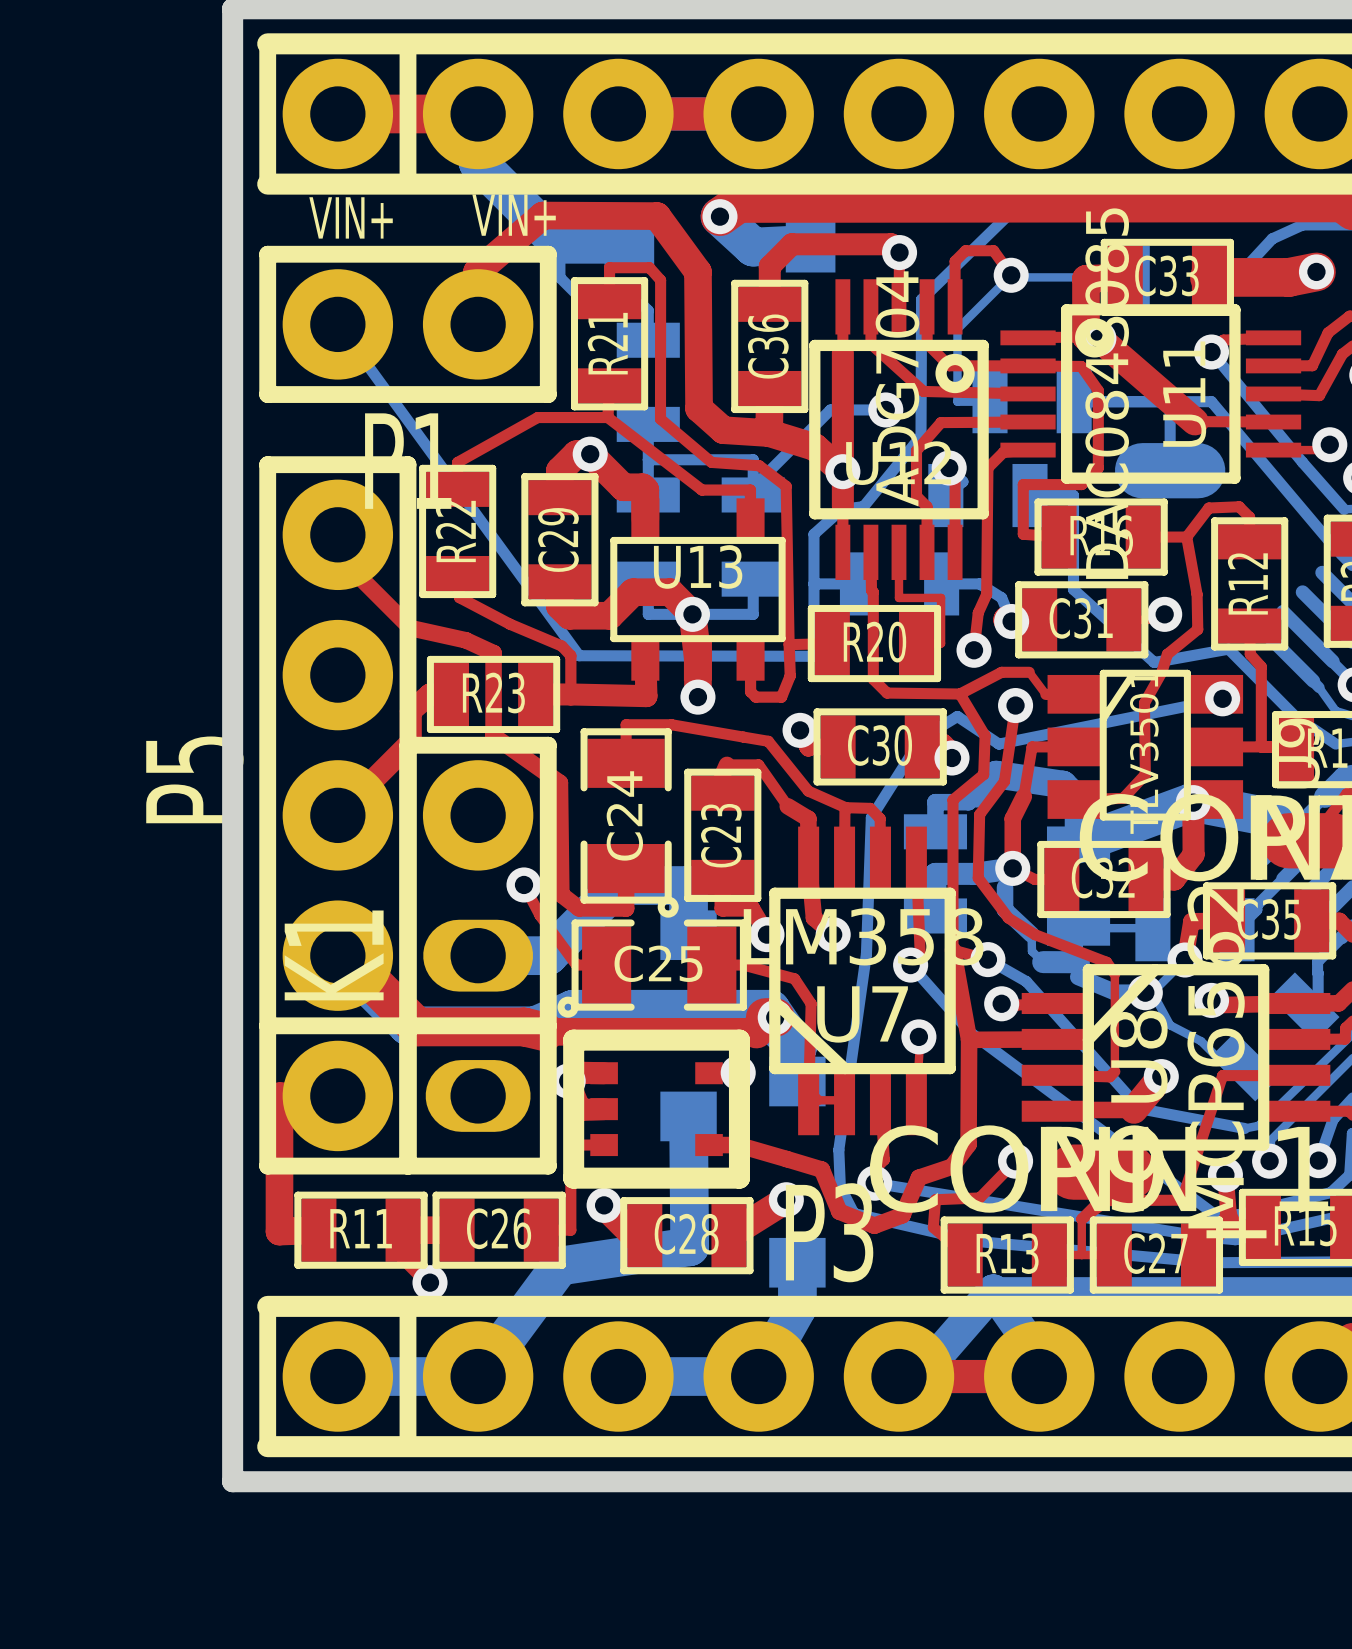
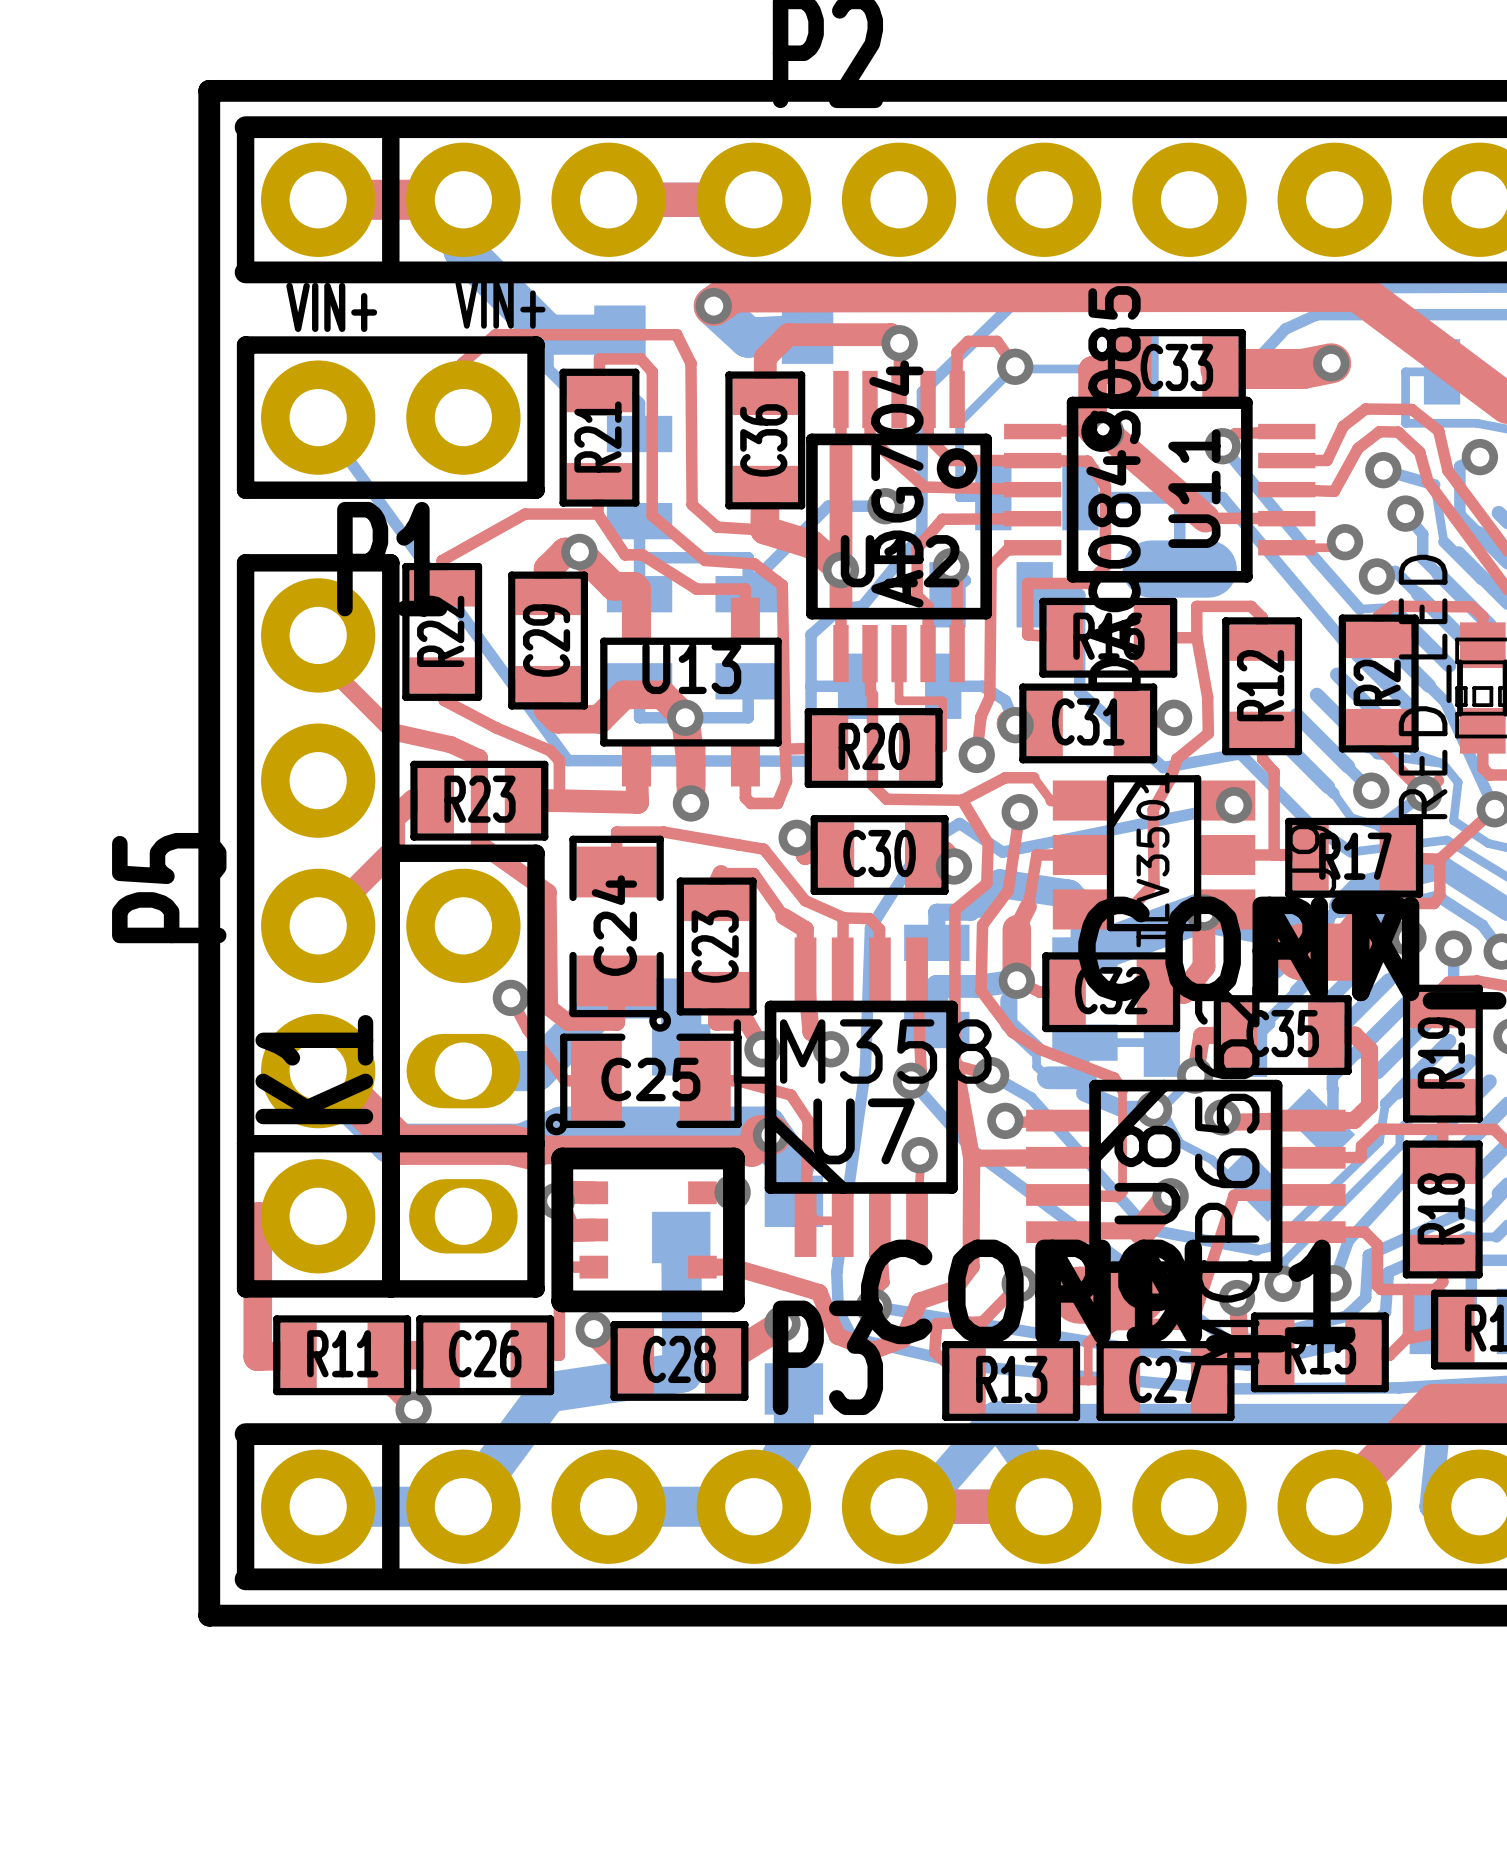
top track: (477, 271) (542, 215) (657, 216) (697, 271) -> (462, 363) (495, 334) (676, 334) (690, 363)
top track width: thick (697, 271) (699, 408) (723, 430) (769, 433) -> thin (690, 363) (692, 504) (717, 527) (764, 530)
top track: (607, 417) (703, 490) -> (597, 514) (625, 554) (642, 554) (696, 589)
top track: (1239, 506) (1208, 508) (1186, 537) -> (1251, 606) (1196, 606) (1196, 637)
top track width: thin (1012, 818) (1012, 868) -> thick (1016, 929) (1016, 980)

